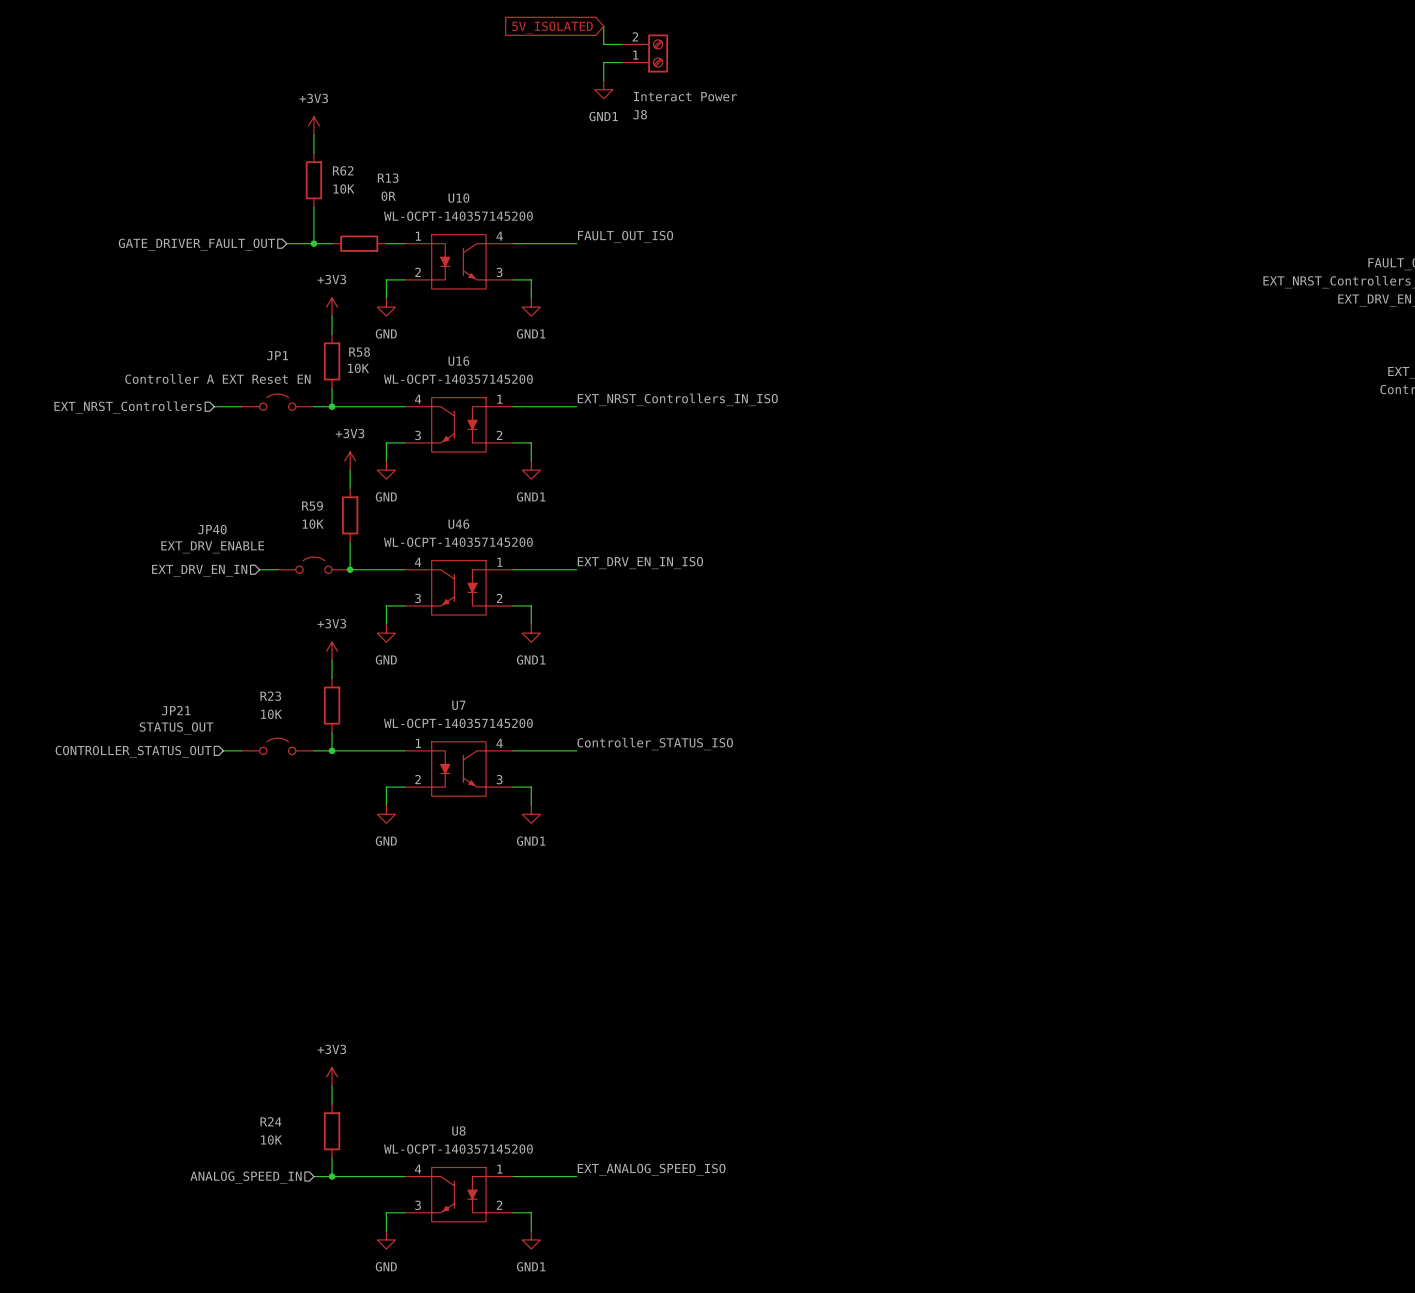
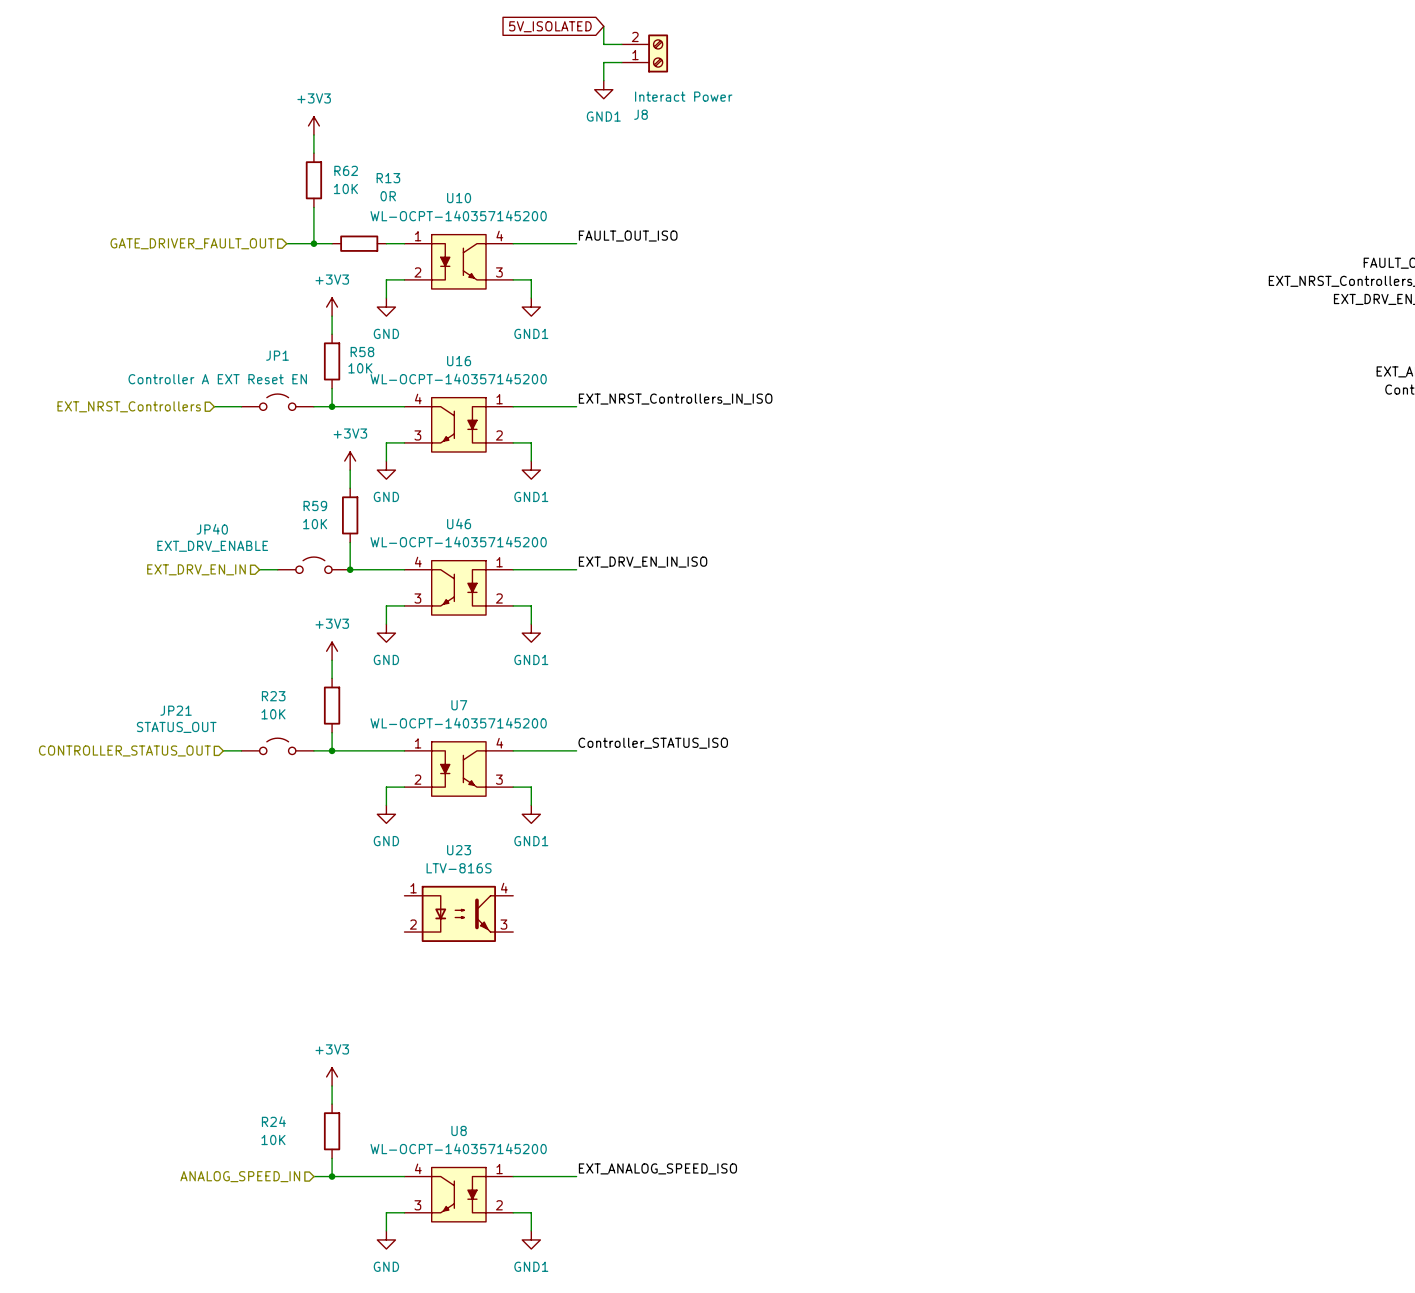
U23: none -> LTV-816S (458, 913)

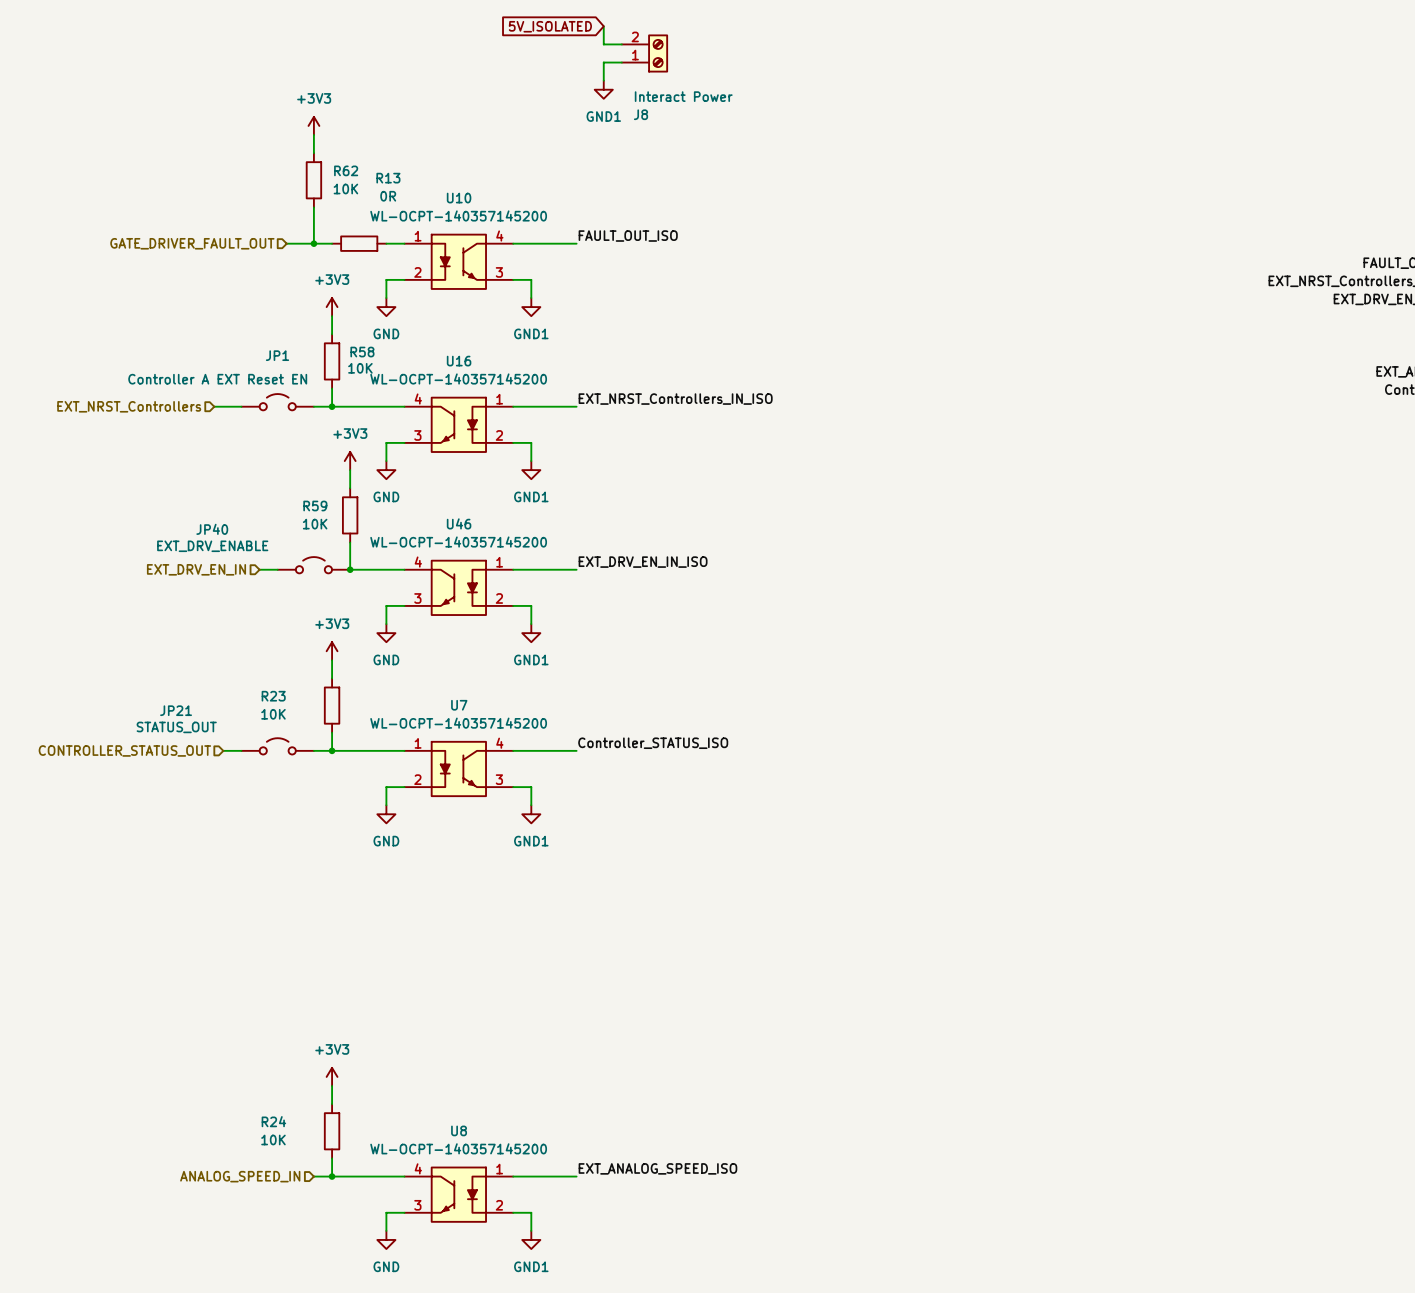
U23: LTV-816S (458, 913) -> none

